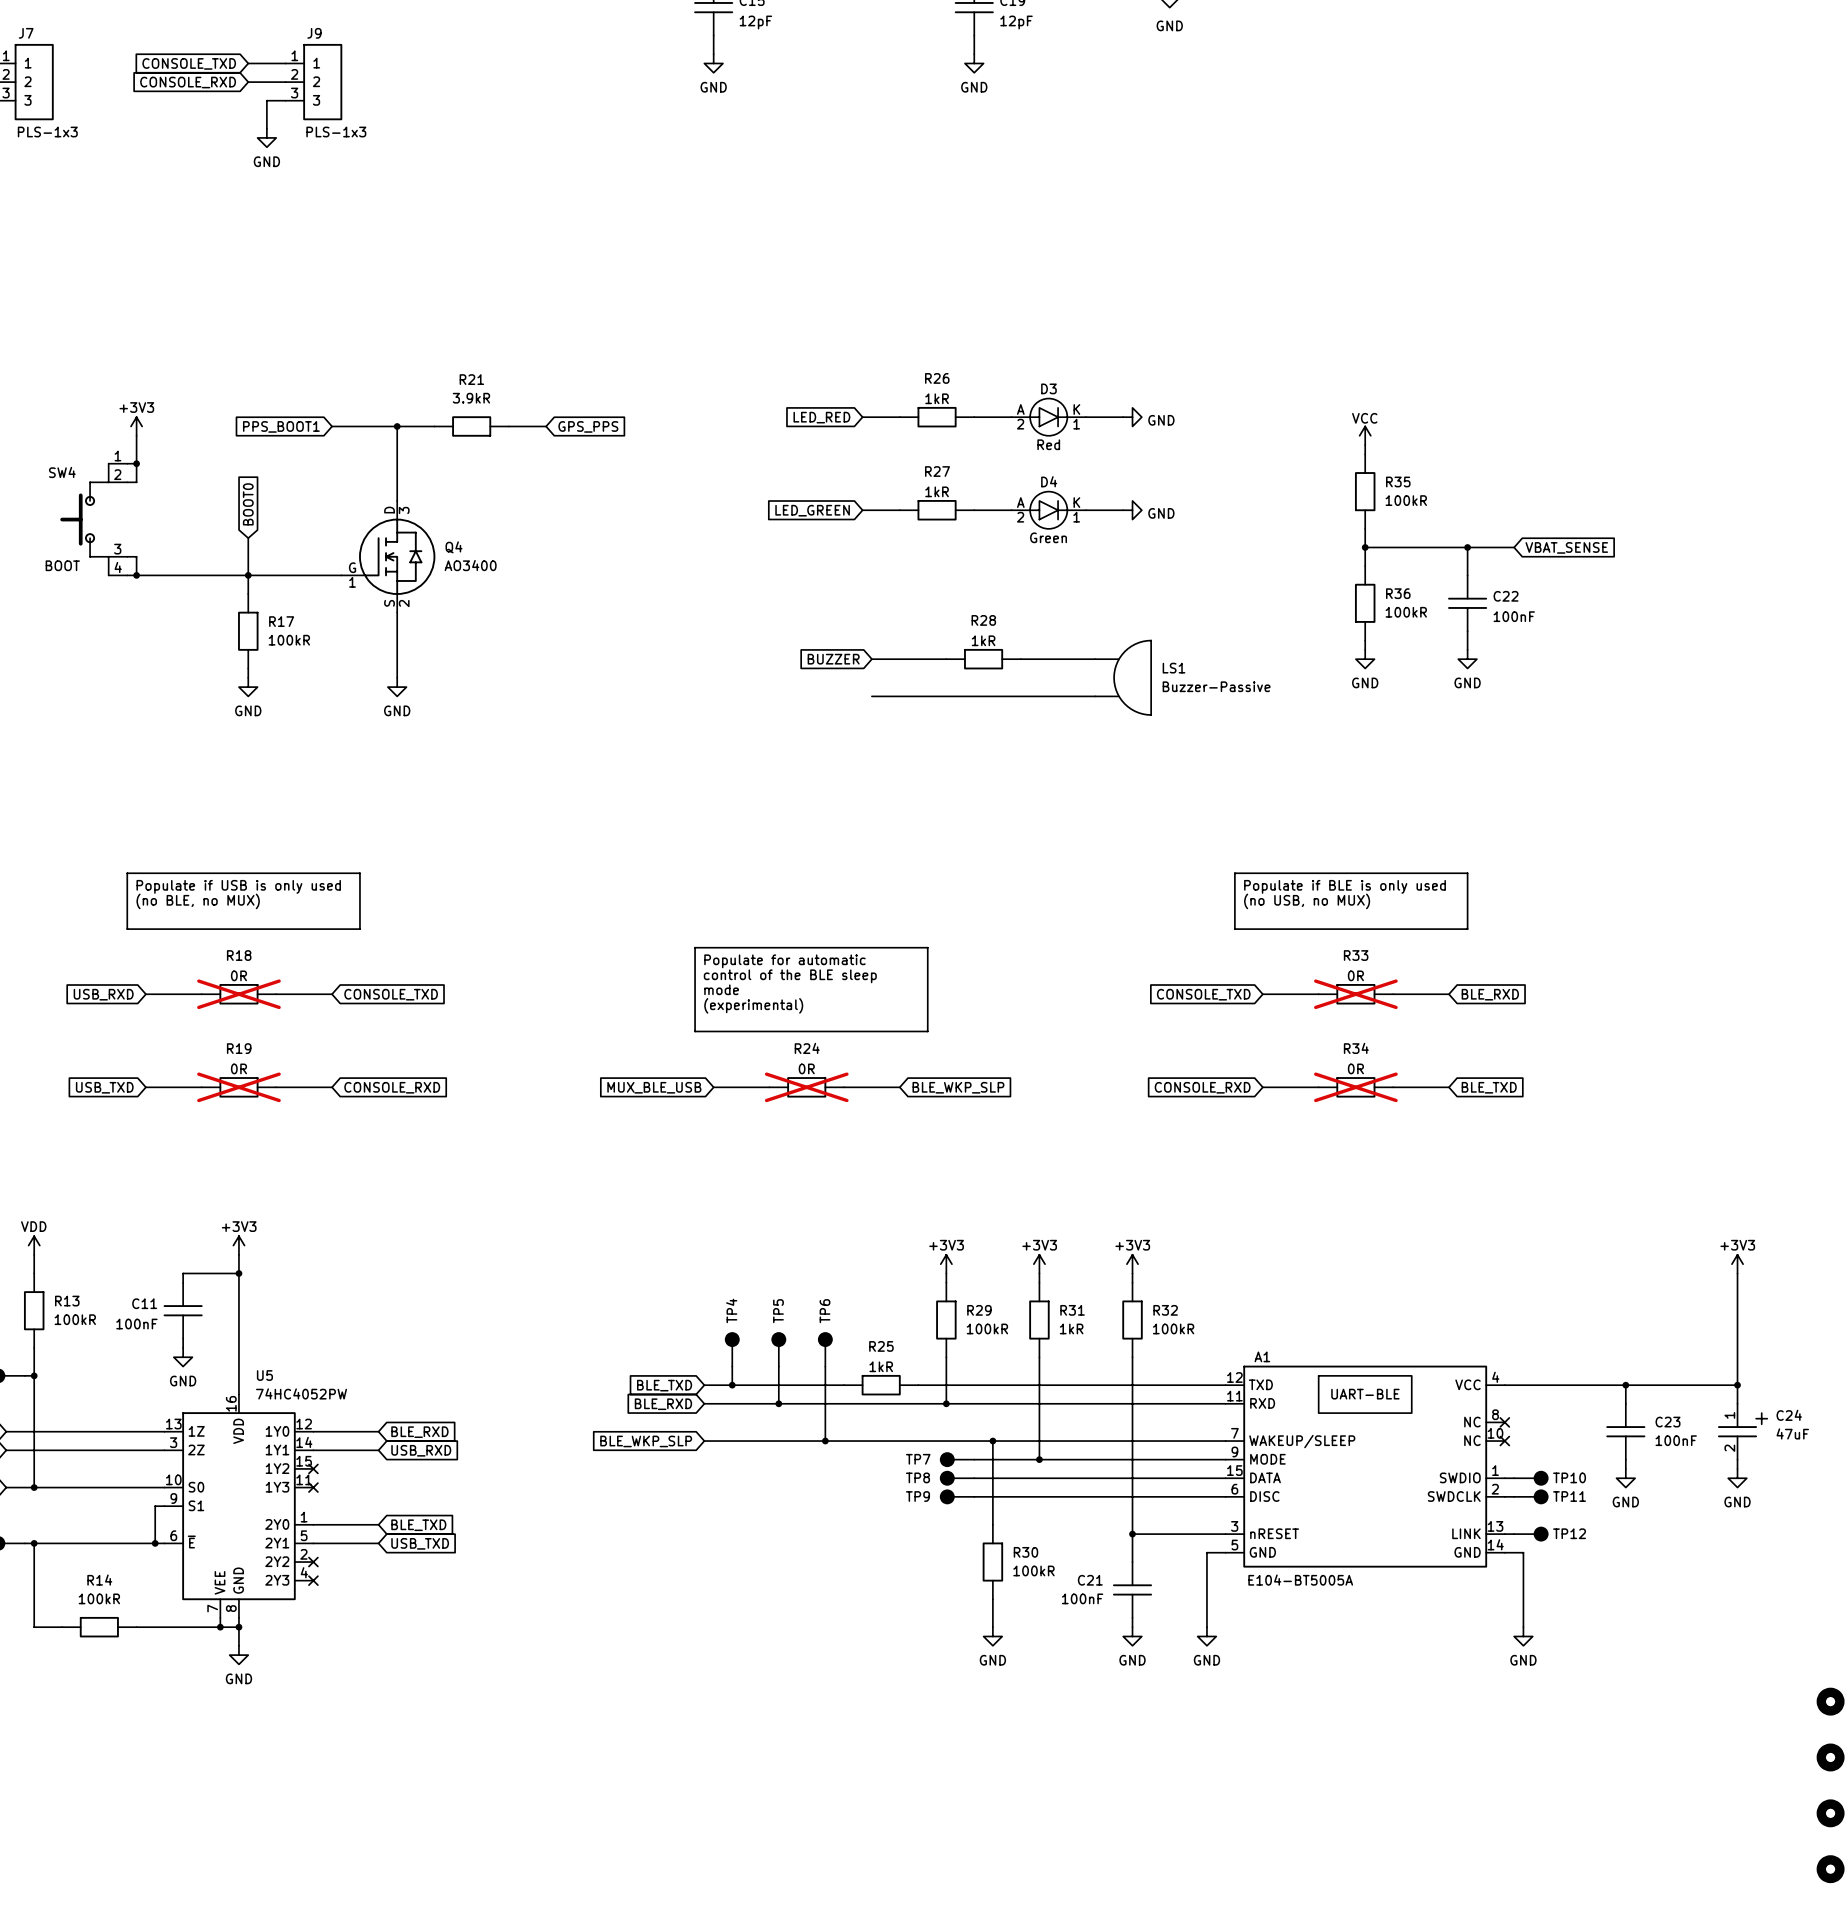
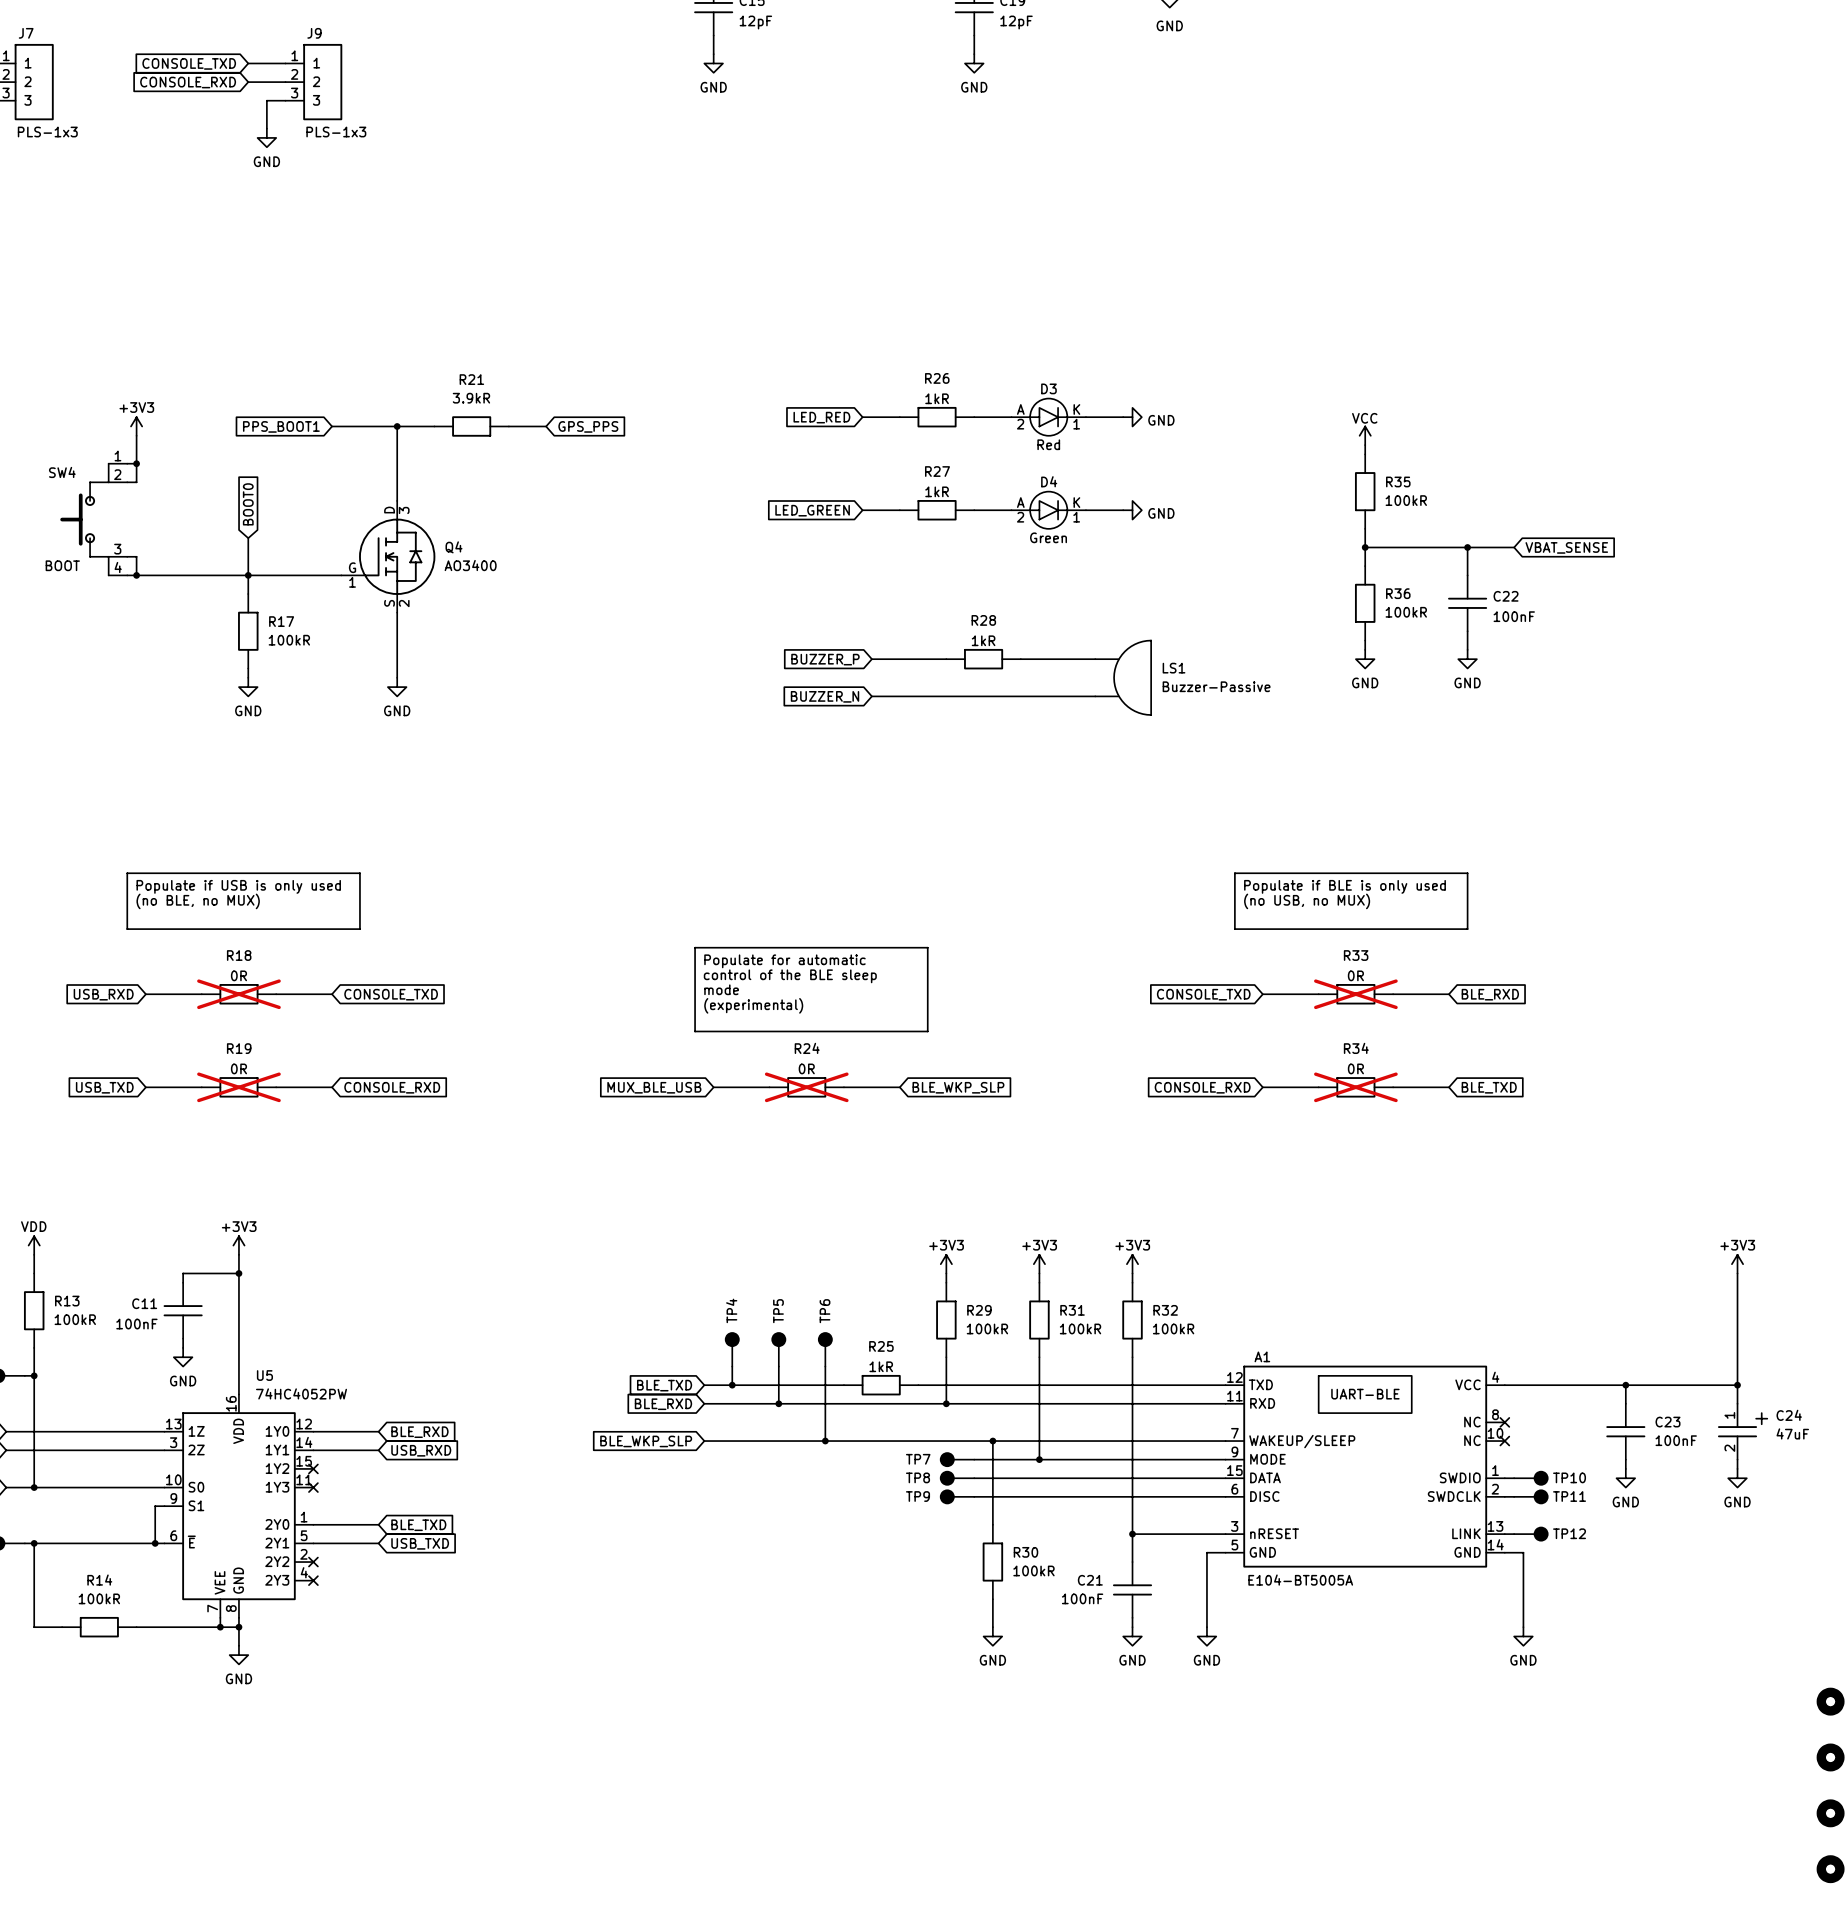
global label: BUZZER (833, 659) -> BUZZER_P (825, 659)
global label: none -> BUZZER_N (825, 696)
R31 value: 1kR (1071, 1328) -> 100kR (1080, 1328)

